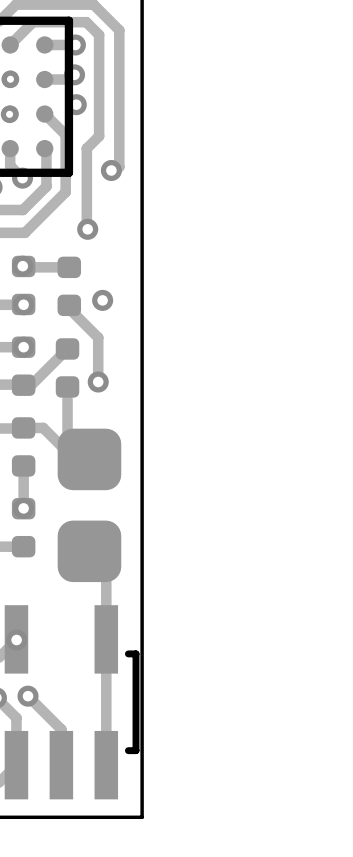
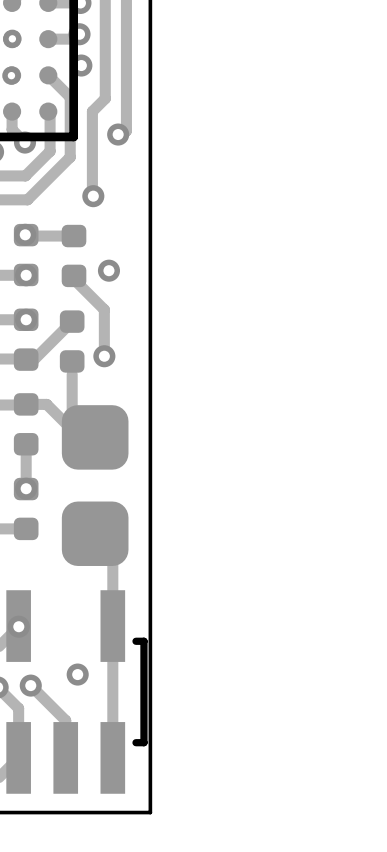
via: none -> (77, 674)

